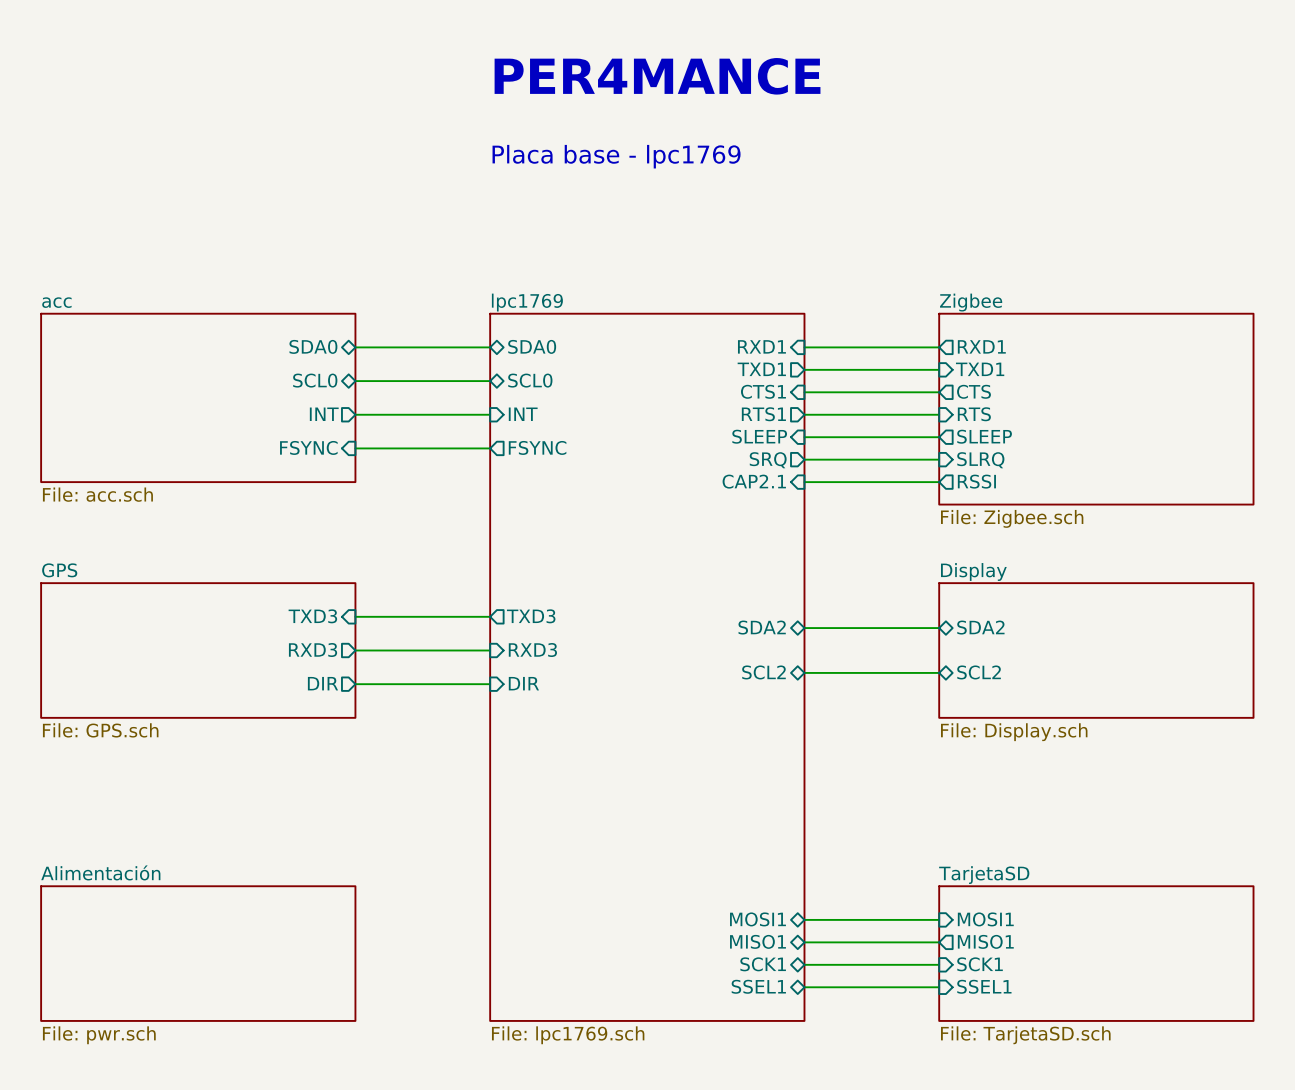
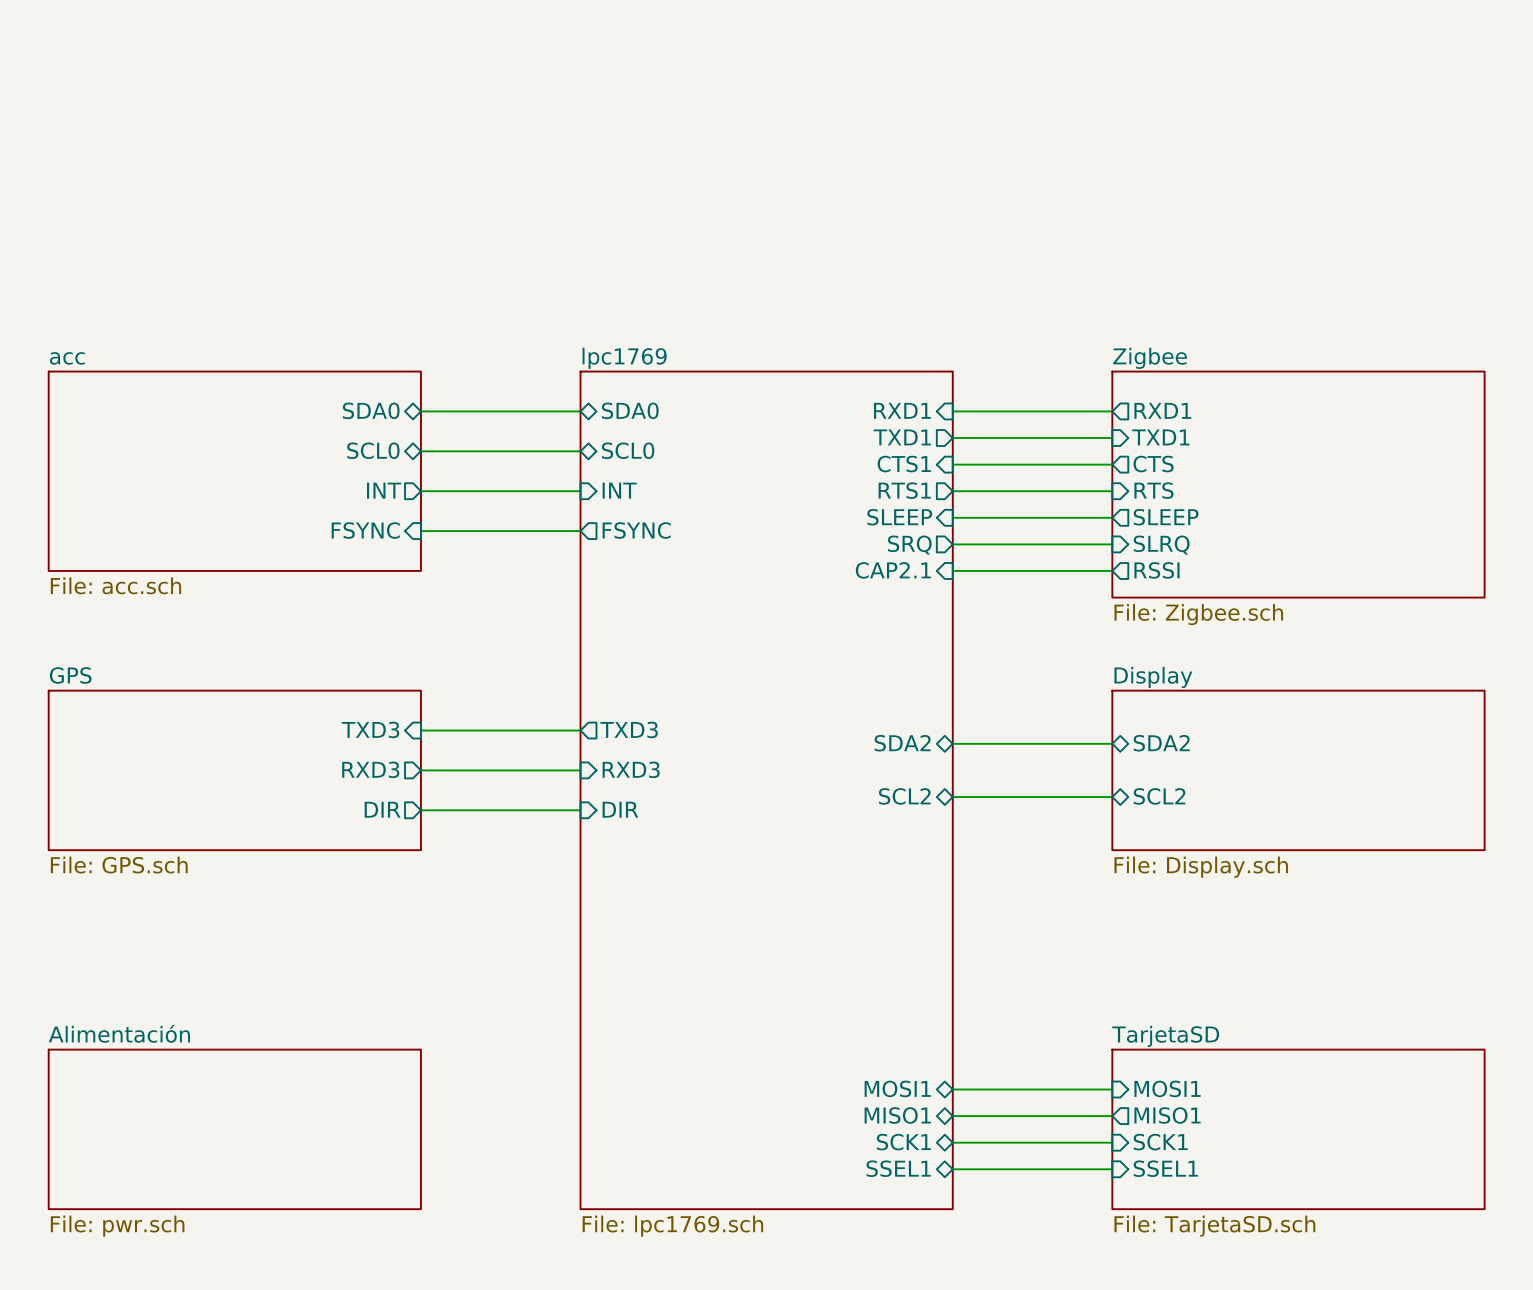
text: PER4MANCE (657, 76) -> none
text: Placa base - lpc1769 (616, 156) -> none

